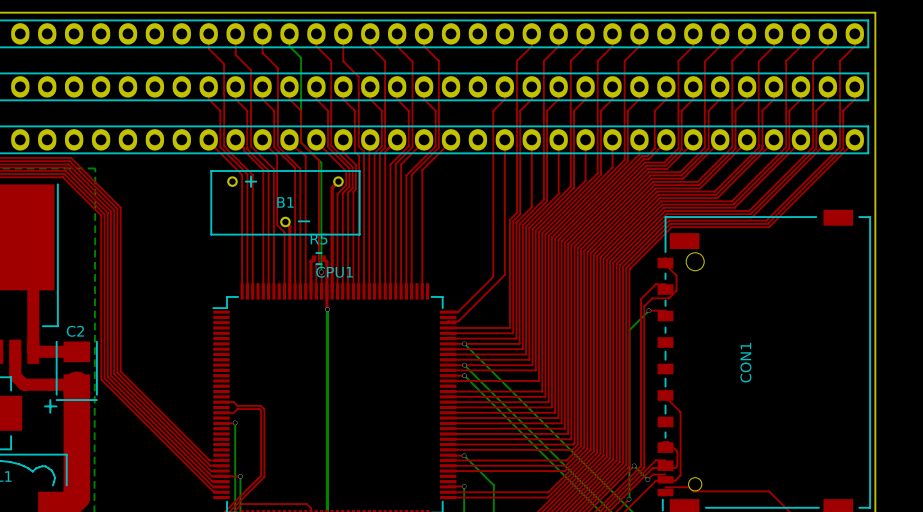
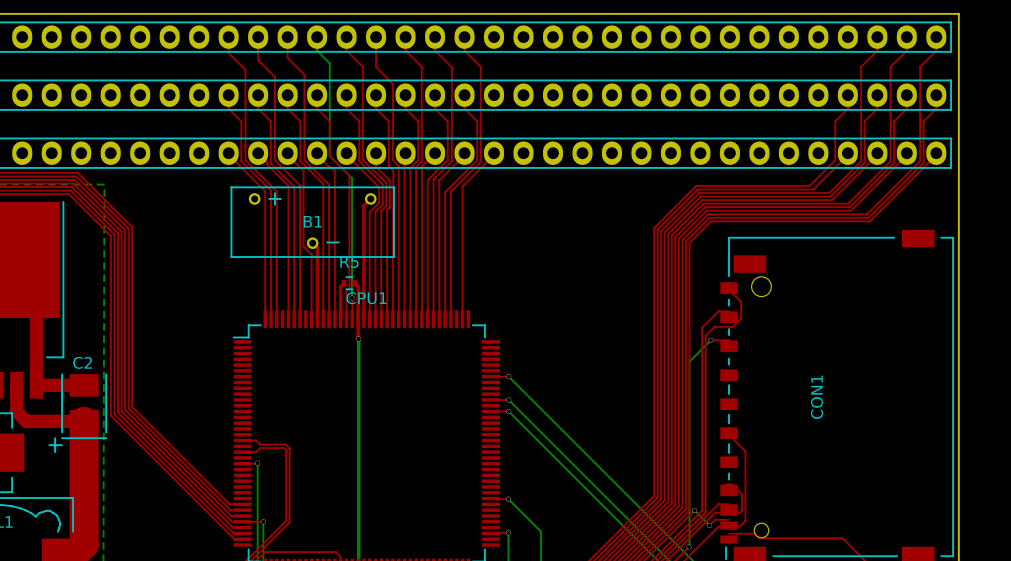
top track: (531, 33) (531, 46) (516, 61) (516, 212) (509, 219) (509, 327) (448, 327) -> none
top track: (558, 33) (558, 46) (543, 61) (543, 199) (519, 223) (519, 343) -> none
top track: (585, 33) (585, 46) (570, 61) (570, 186) (529, 227) (529, 359) (448, 359) -> none
top track: (612, 33) (612, 46) (597, 61) (597, 173) (539, 231) (539, 380) (448, 380) -> none
top track: (639, 33) (639, 46) (624, 61) (624, 160) (548, 235) (548, 402) (448, 402) -> none
top track: (693, 33) (693, 46) (678, 61) (678, 148) (664, 162) (644, 162) (564, 242) (564, 428) (448, 428) -> none
top track: (720, 33) (720, 46) (704, 61) (704, 147) (680, 172) (649, 172) (574, 246) (574, 443) (448, 444) -> none
top track: (747, 33) (747, 46) (732, 61) (732, 147) (697, 181) (653, 181) (584, 250) (584, 447) (565, 465) (448, 465) -> none
top track: (774, 33) (774, 46) (758, 61) (758, 147) (714, 191) (657, 191) (593, 254) (593, 451) (547, 497) (448, 497) -> none
top track: (504, 86) (504, 99) (493, 110) (493, 276) (458, 312) (448, 312) -> none
top track: (531, 86) (531, 99) (520, 110) (520, 214) (513, 221) (513, 333) (448, 333) -> none
top track: (558, 86) (558, 99) (547, 110) (547, 201) (522, 225) (522, 349) (448, 349) -> none
top track: (585, 86) (585, 99) (574, 110) (574, 187) (532, 229) (532, 365) (464, 365) -> none
top track: (612, 86) (612, 99) (600, 110) (600, 174) (542, 233) (542, 391) (448, 391) -> none
top track: (639, 86) (639, 99) (627, 110) (627, 161) (551, 237) (551, 407) (448, 407) -> none
top track: (666, 86) (666, 99) (654, 110) (654, 148) (647, 156) (642, 156) (558, 239) (558, 418) (448, 418) -> none
top track: (693, 86) (693, 99) (681, 110) (681, 149) (665, 165) (646, 165) (568, 244) (568, 433) (448, 433) -> none
top track: (720, 86) (720, 99) (708, 110) (708, 148) (681, 175) (650, 175) (577, 248) (577, 444) (572, 449) (448, 449) -> none
top track: (747, 86) (747, 99) (735, 110) (735, 148) (698, 185) (654, 185) (587, 252) (587, 448) (565, 471) (448, 471) -> none
top track: (504, 139) (504, 274) (458, 321) (448, 322) -> none
top track: (531, 139) (531, 207) (516, 222) (516, 338) (448, 338) -> none
top track: (558, 139) (558, 194) (526, 226) (526, 354) (448, 354) -> none
top track: (585, 139) (585, 180) (535, 230) (535, 370) (448, 370) -> none
top track: (612, 139) (612, 167) (545, 234) (545, 396) (448, 396) -> none
top track: (639, 139) (639, 154) (555, 238) (555, 412) -> none
top track: (666, 139) (648, 159) (643, 159) (561, 241) (561, 423) (448, 423) -> none
top track: (693, 139) (693, 142) (666, 168) (647, 168) (571, 245) (571, 439) (448, 439) -> none
top track: (720, 139) (683, 178) (651, 178) (581, 249) (581, 446) (566, 460) (448, 460) -> none
top track: (747, 139) (700, 188) (655, 188) (590, 253) (590, 450) (548, 492) (448, 492) -> none
top track: (762, 146) (762, 148) (716, 194) (658, 194) (597, 256) -> (835, 160) (809, 185) (696, 185) (654, 228) (654, 280)
top track: (742, 173) (717, 198) (659, 198) (600, 257) -> (813, 189) (697, 189) (657, 229) (657, 281)
top track: (757, 176) (732, 201) (661, 201) (603, 258) -> (829, 193) (699, 193) (661, 231) (661, 283)
top track: (758, 179) (733, 204) (662, 204) (606, 260) -> (830, 196) (700, 196) (664, 232) (664, 284)
top track: (759, 182) (734, 207) (663, 207) (610, 261) -> (832, 200) (702, 200) (668, 234) (668, 286)
top track: (774, 185) (749, 210) (665, 210) (613, 262) -> (848, 203) (703, 203) (671, 235) (671, 287)
top track: (775, 189) (750, 214) (666, 214) (616, 264) -> (849, 207) (705, 207) (675, 236) (675, 289)
top track: (776, 192) (751, 217) (667, 217) (619, 265) -> (851, 210) (706, 210) (678, 238) (678, 290)
top track: (791, 195) (766, 220) (669, 220) (623, 266) -> (867, 214) (708, 214) (682, 239) (682, 292)
top track: (792, 198) (767, 223) (670, 223) (626, 268) -> (868, 217) (709, 217) (685, 241) (685, 293)
top track: (794, 202) (769, 227) (671, 227) (629, 269) -> (869, 221) (710, 221) (689, 242) (689, 295)
top track: (464, 343) (519, 343) -> none
top track: (448, 412) (555, 412) -> none

